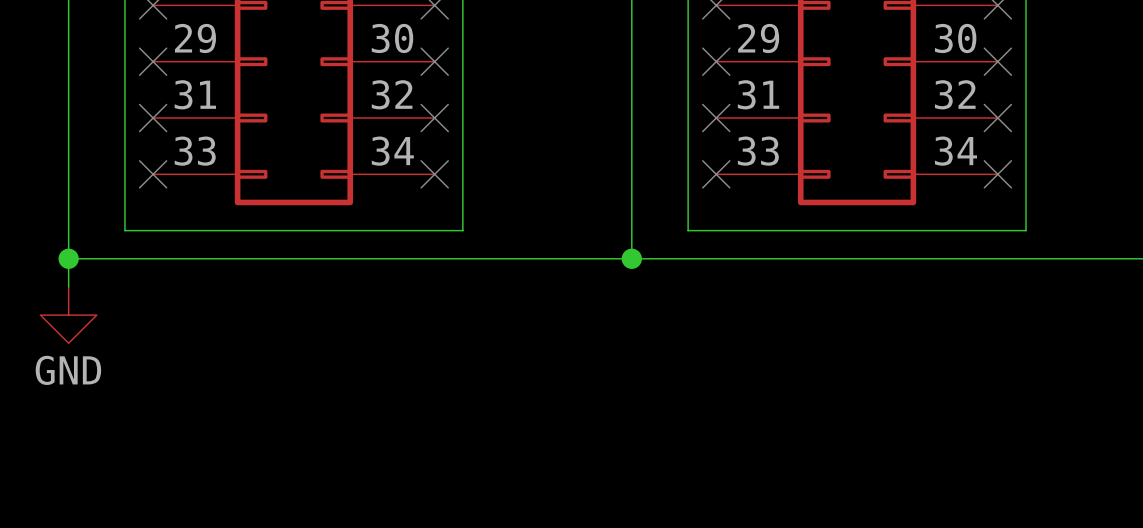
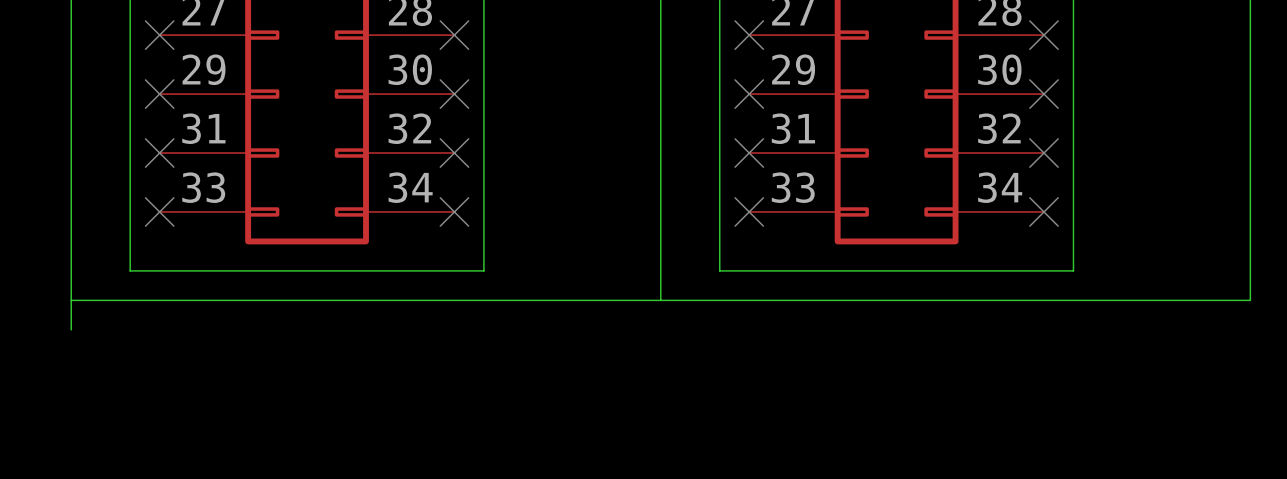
junction: (68, 258) -> none
junction: (631, 258) -> none
power symbol: GND (68, 315) -> none

